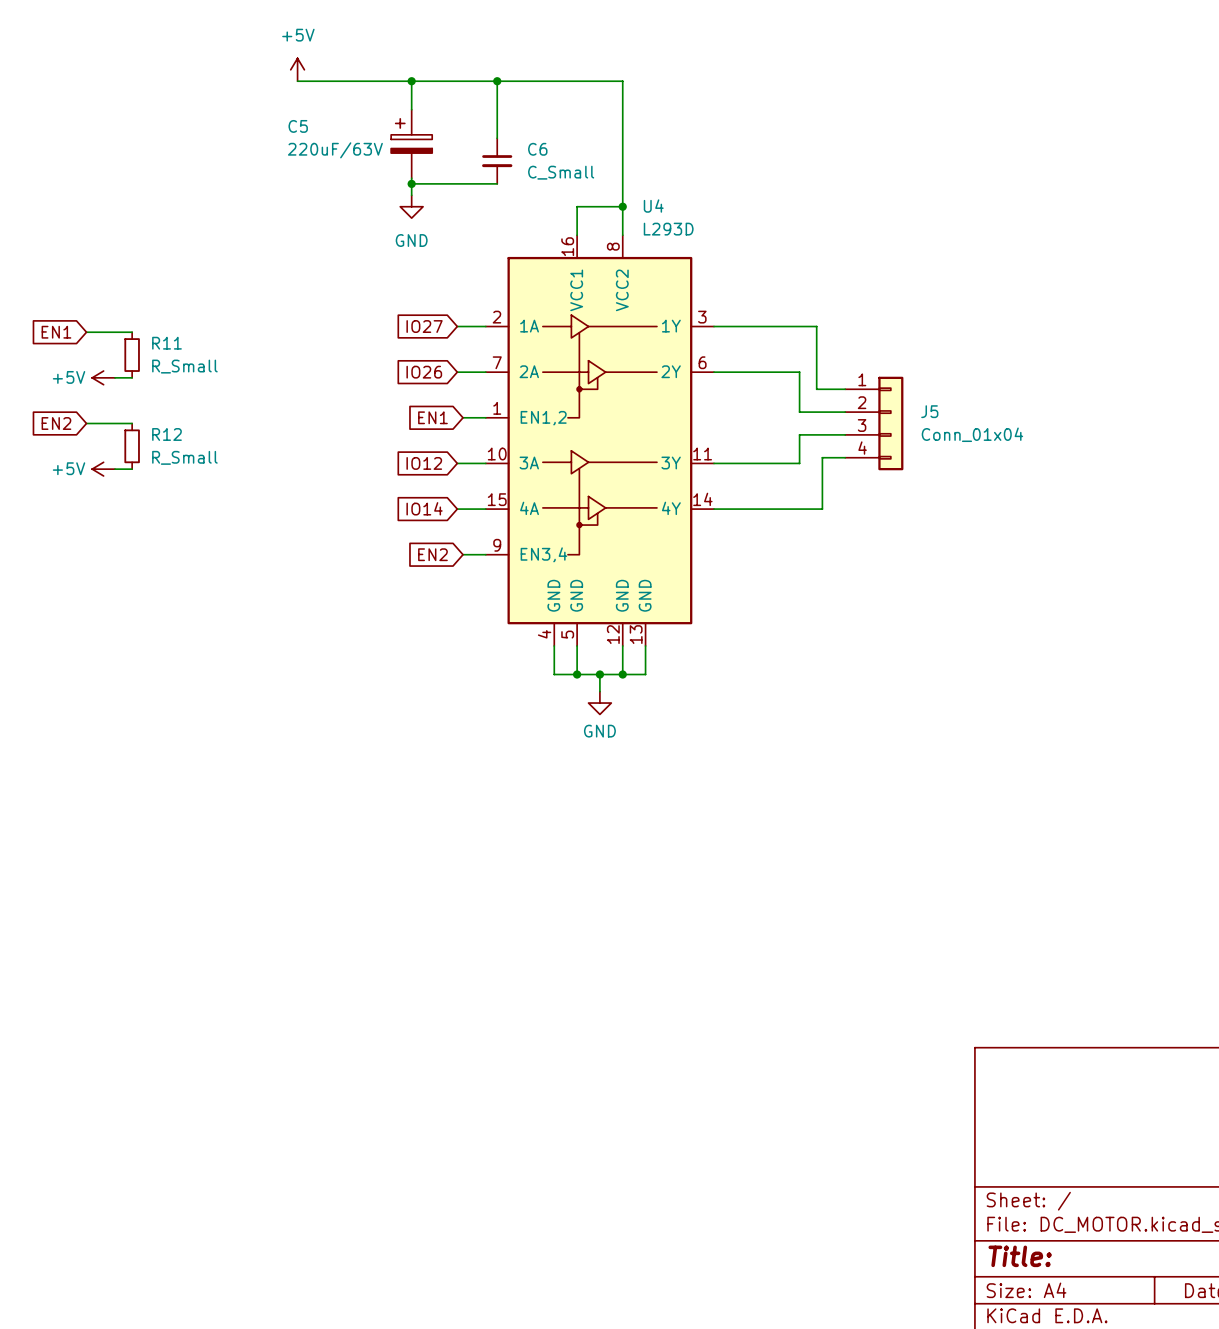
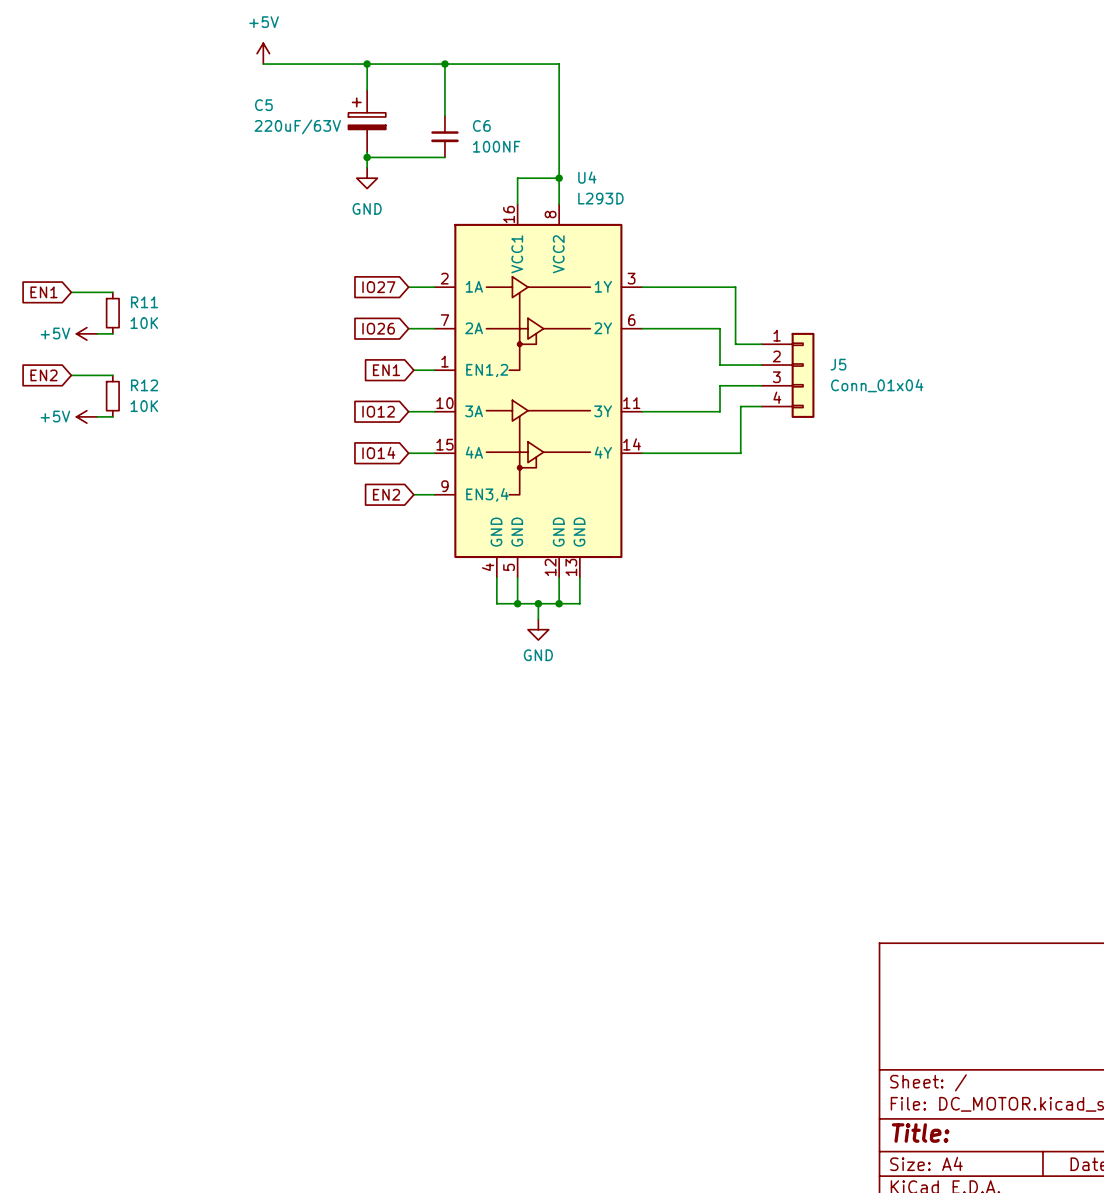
C6 value: C_Small (561, 172) -> 100NF (496, 146)
R11 value: R_Small (184, 366) -> 10K (144, 323)
R12 value: R_Small (184, 457) -> 10K (144, 406)

